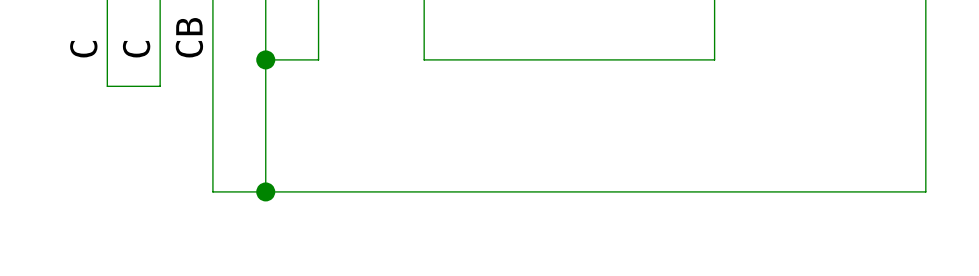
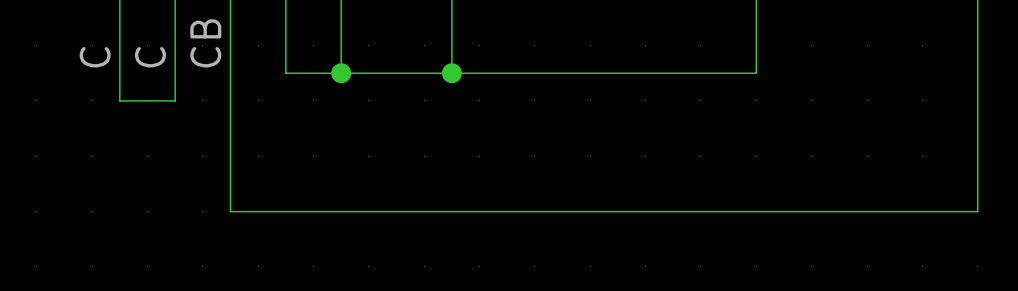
wire: (265, 59) (265, 191) -> none
junction position: (265, 59) -> (341, 73)
wire: none -> (341, 73) (451, 73)
junction: none -> (451, 73)
junction: (265, 191) -> none

